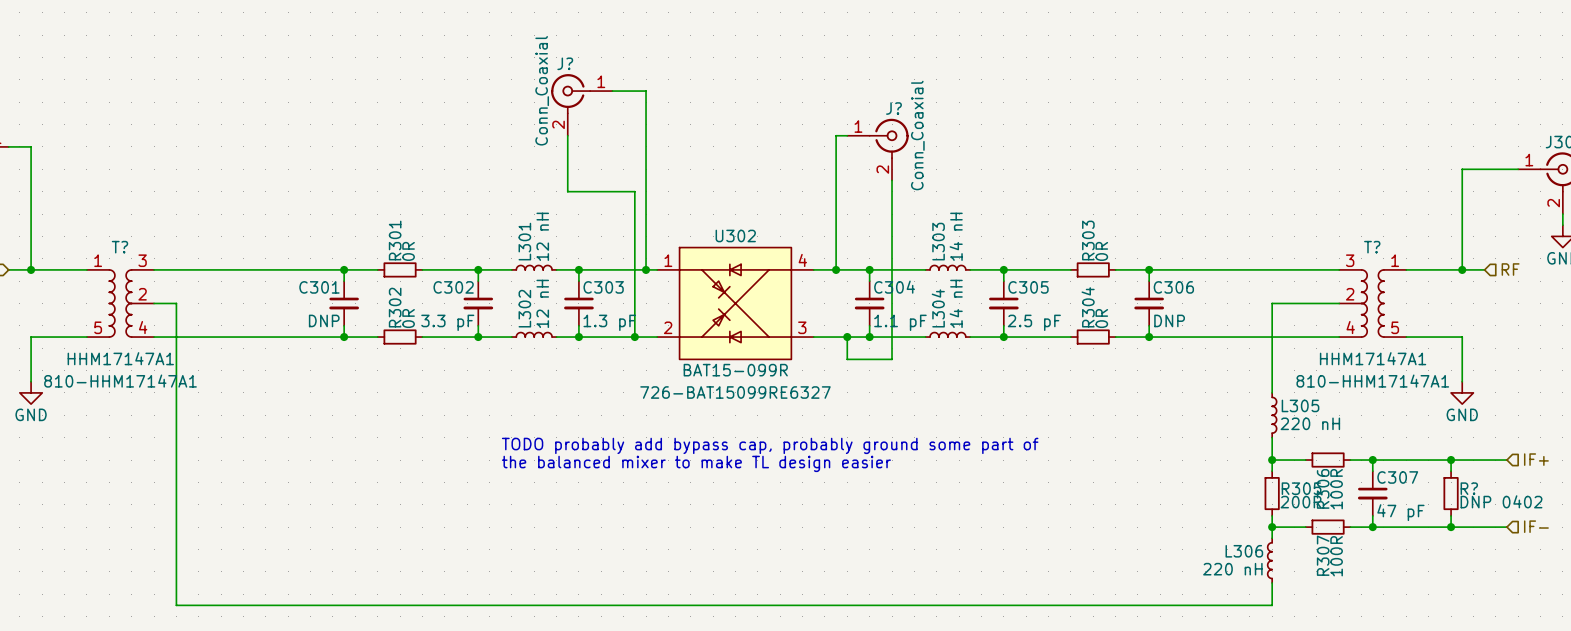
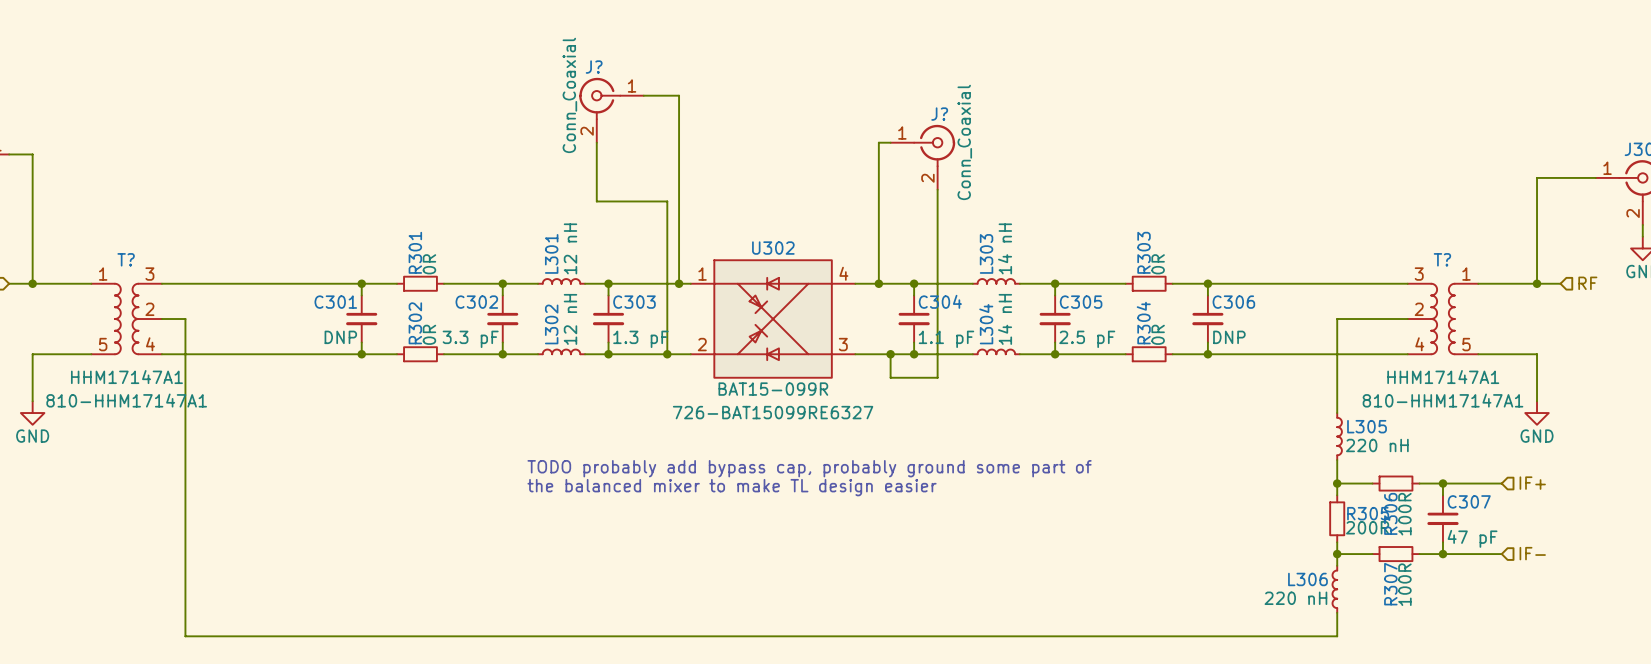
hierarchical label position: IF+ (1536, 459) -> IF+ (1532, 483)
wire: (1428, 460) (1506, 460) -> none
wire: (1451, 460) (1451, 471) -> none
junction: (1451, 460) -> none
R?: DNP 0402 (1451, 493) -> none
wire: (1451, 515) (1451, 527) -> none
hierarchical label position: IF- (1536, 526) -> IF- (1532, 553)
wire: (1428, 527) (1506, 527) -> none
junction: (1451, 527) -> none

